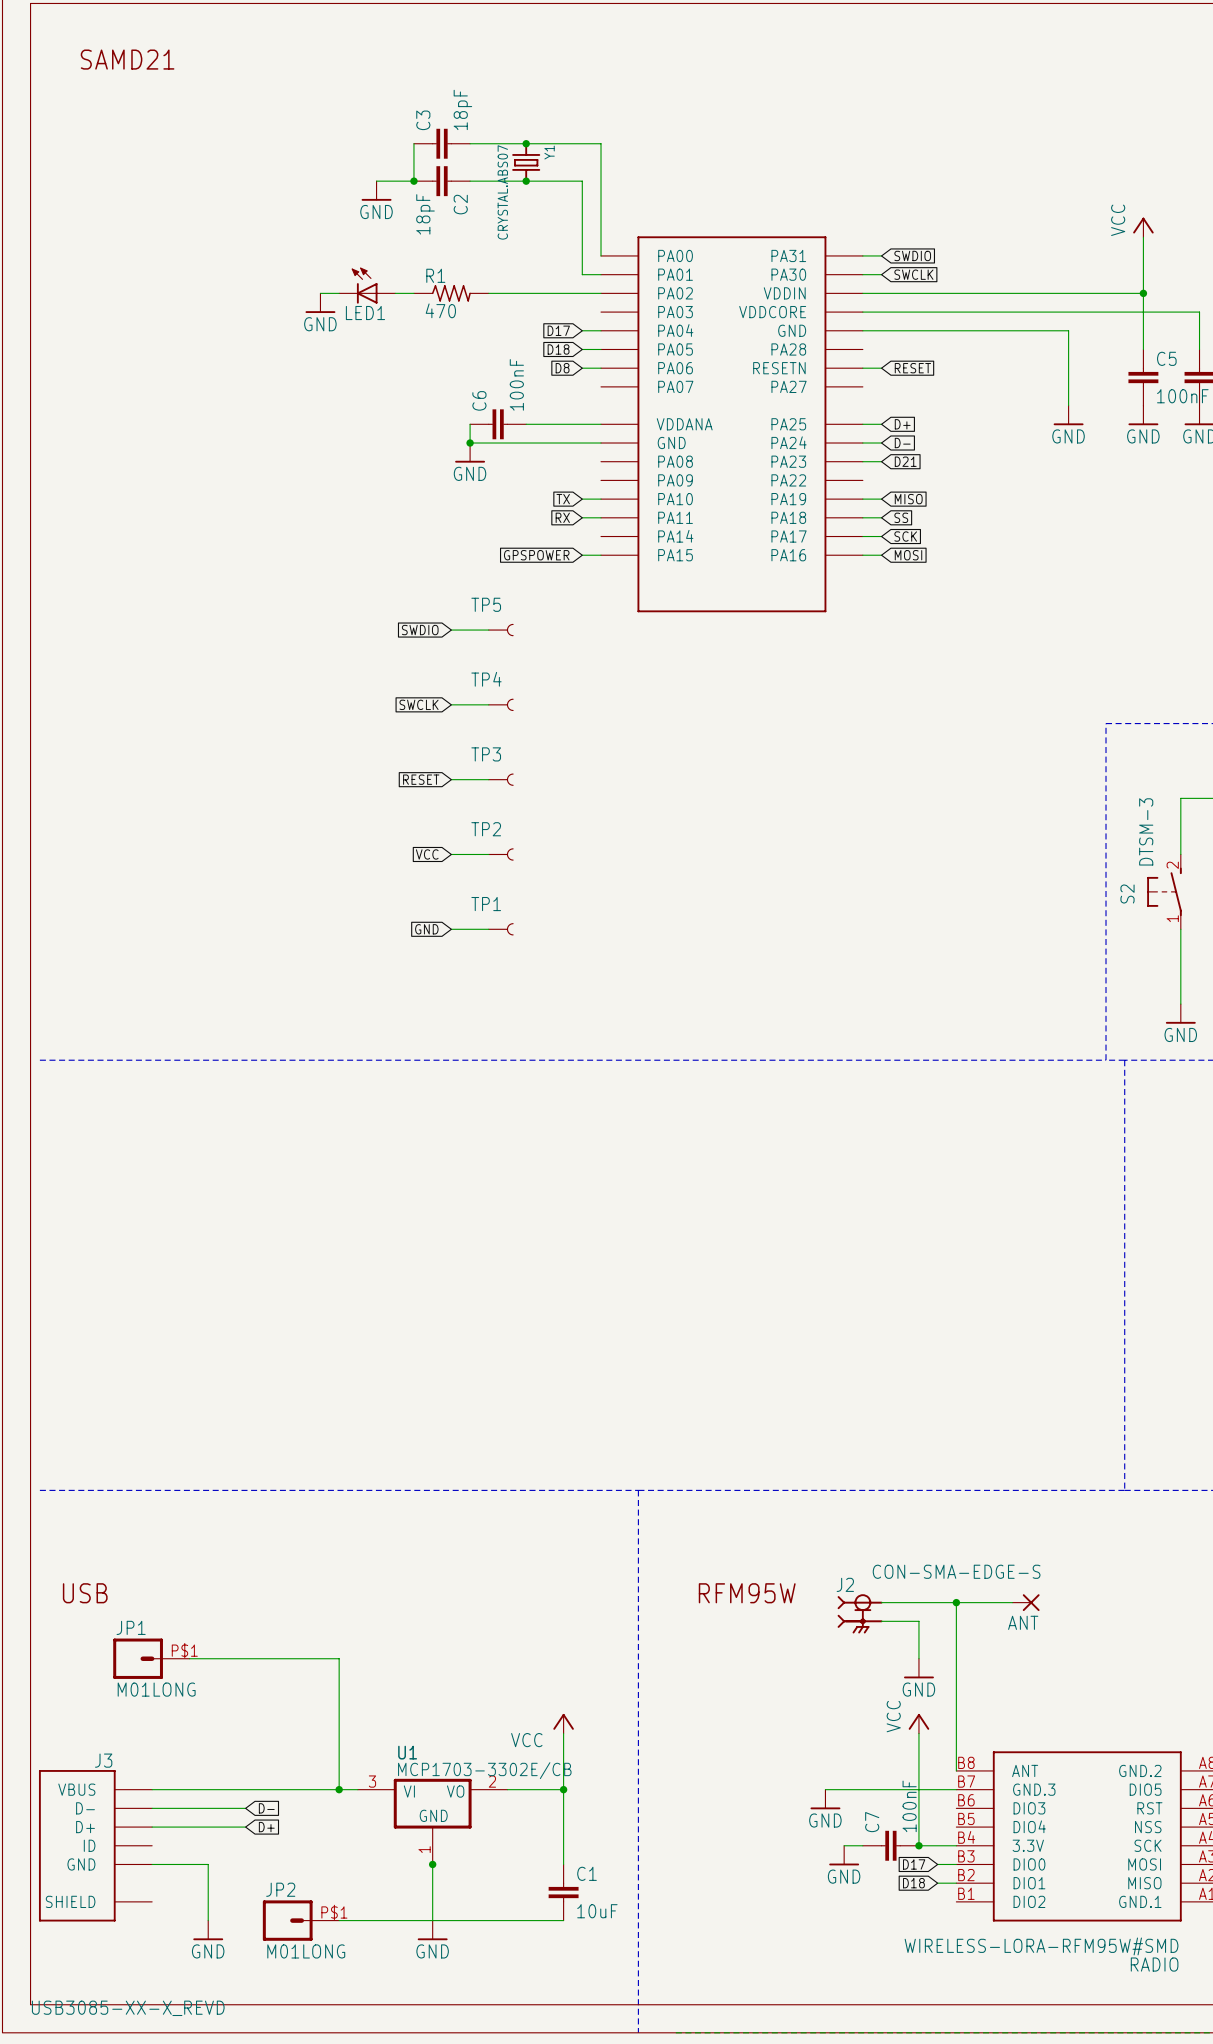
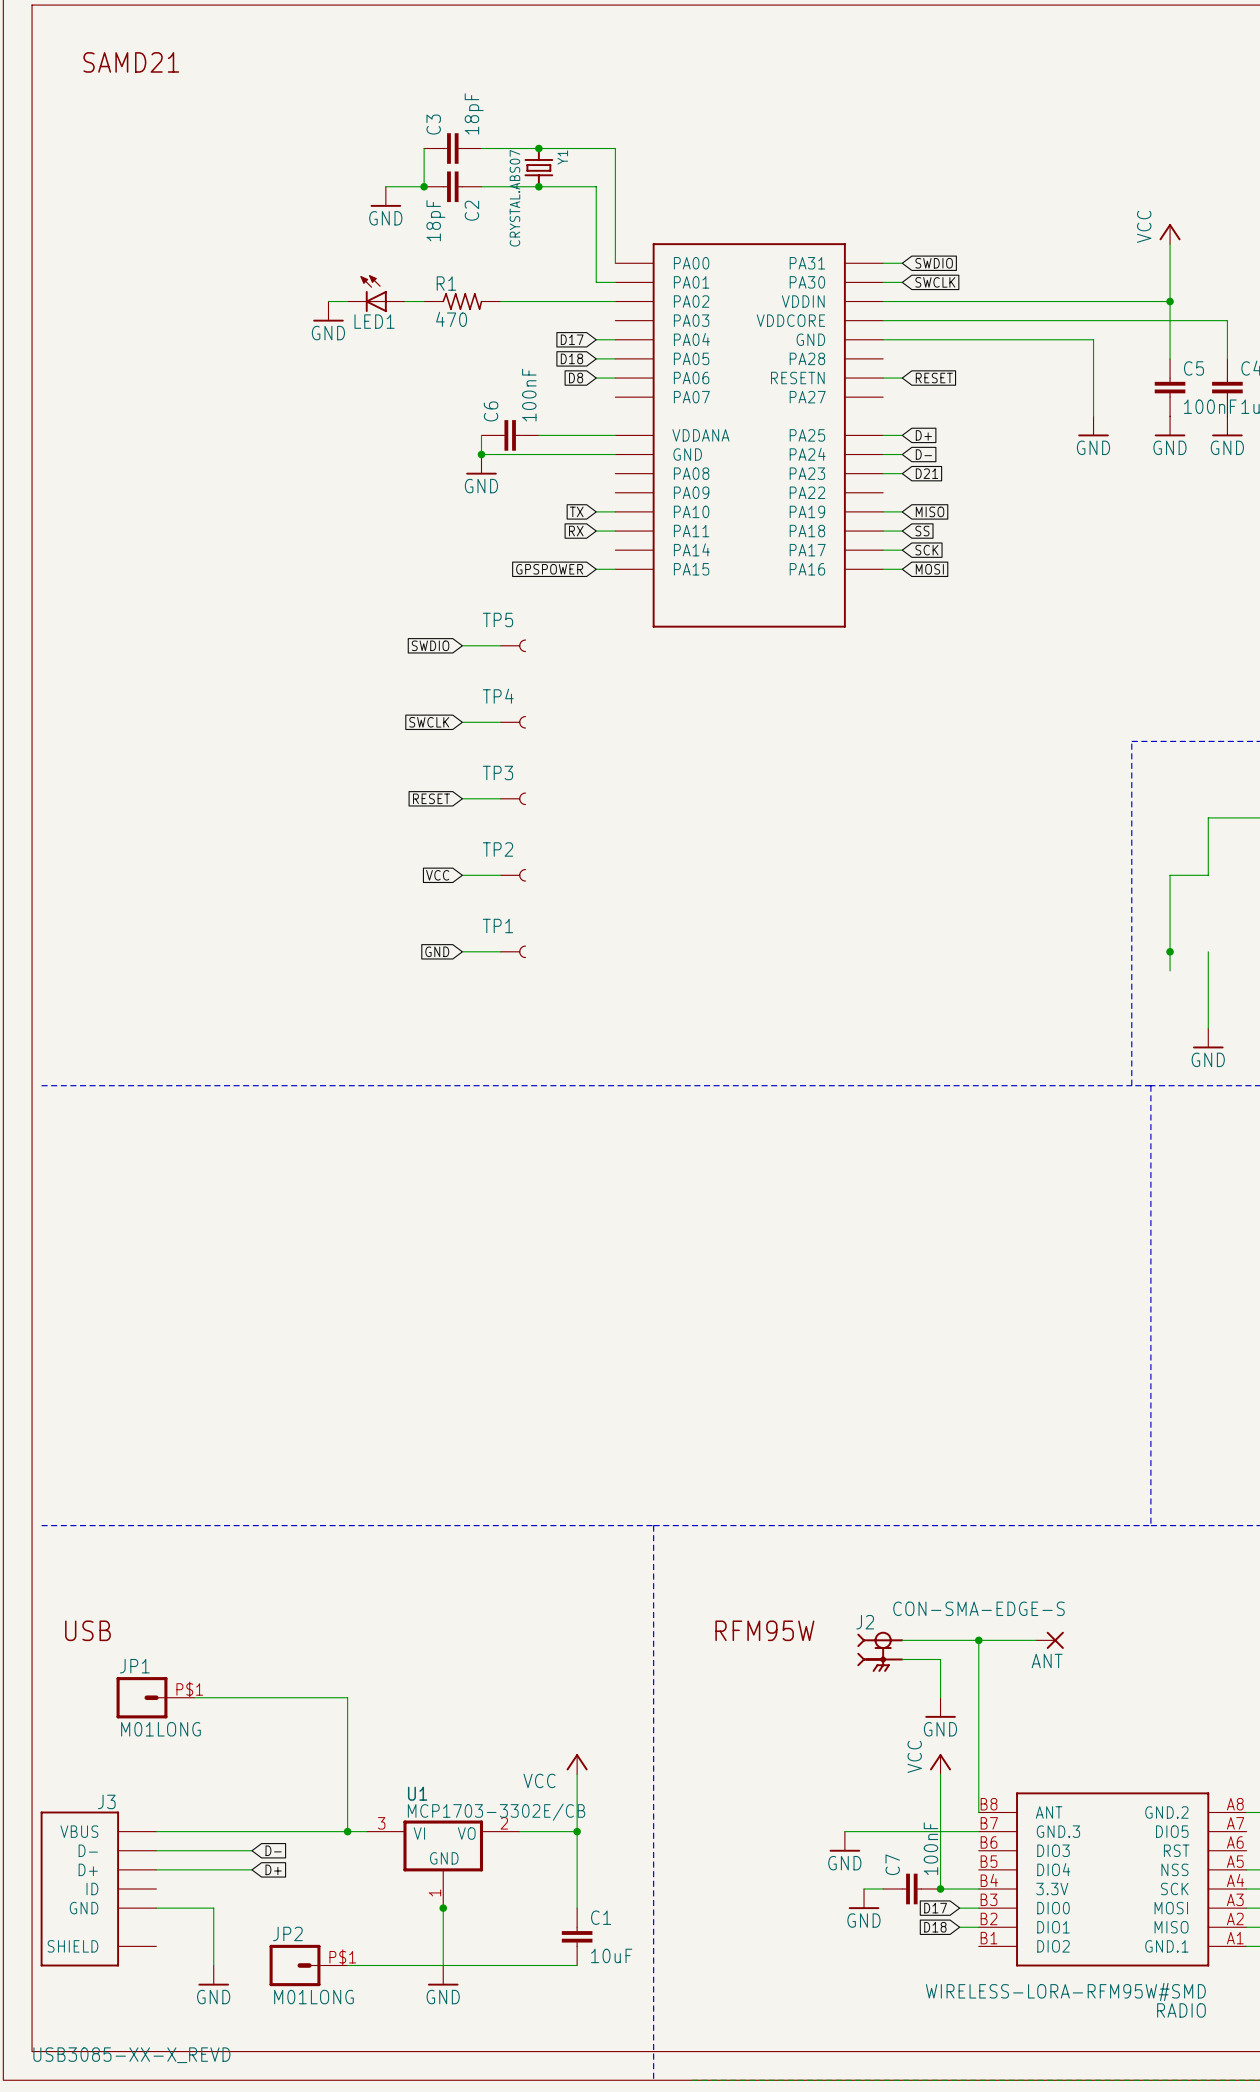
wire: none -> (1208, 875) (1170, 875) (1170, 970)
S2: DTSM-3 (1164, 891) -> none
junction: none -> (1170, 951)

